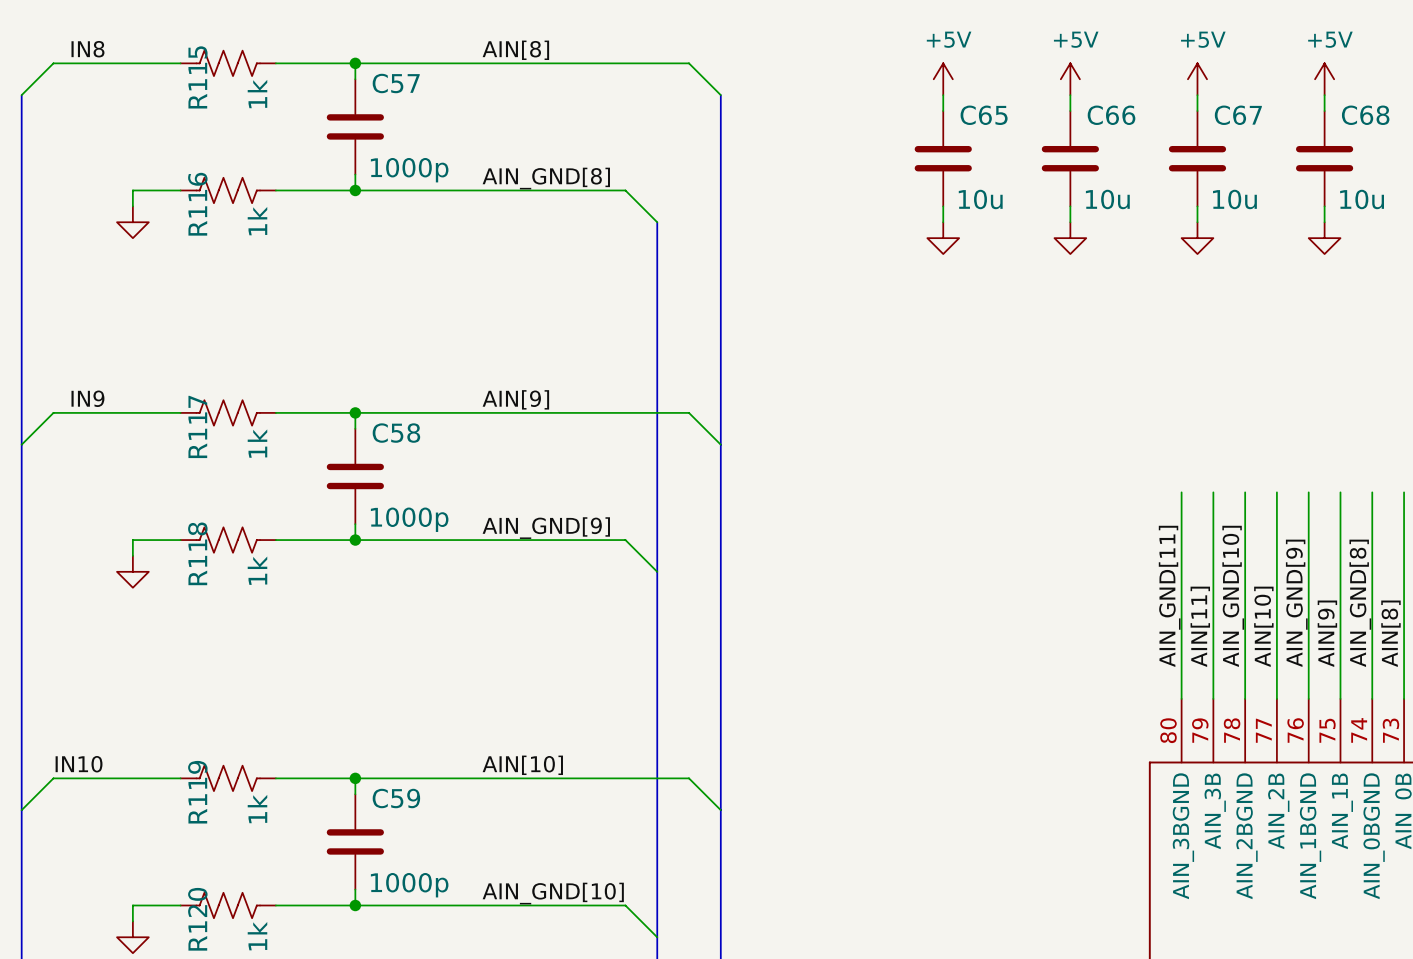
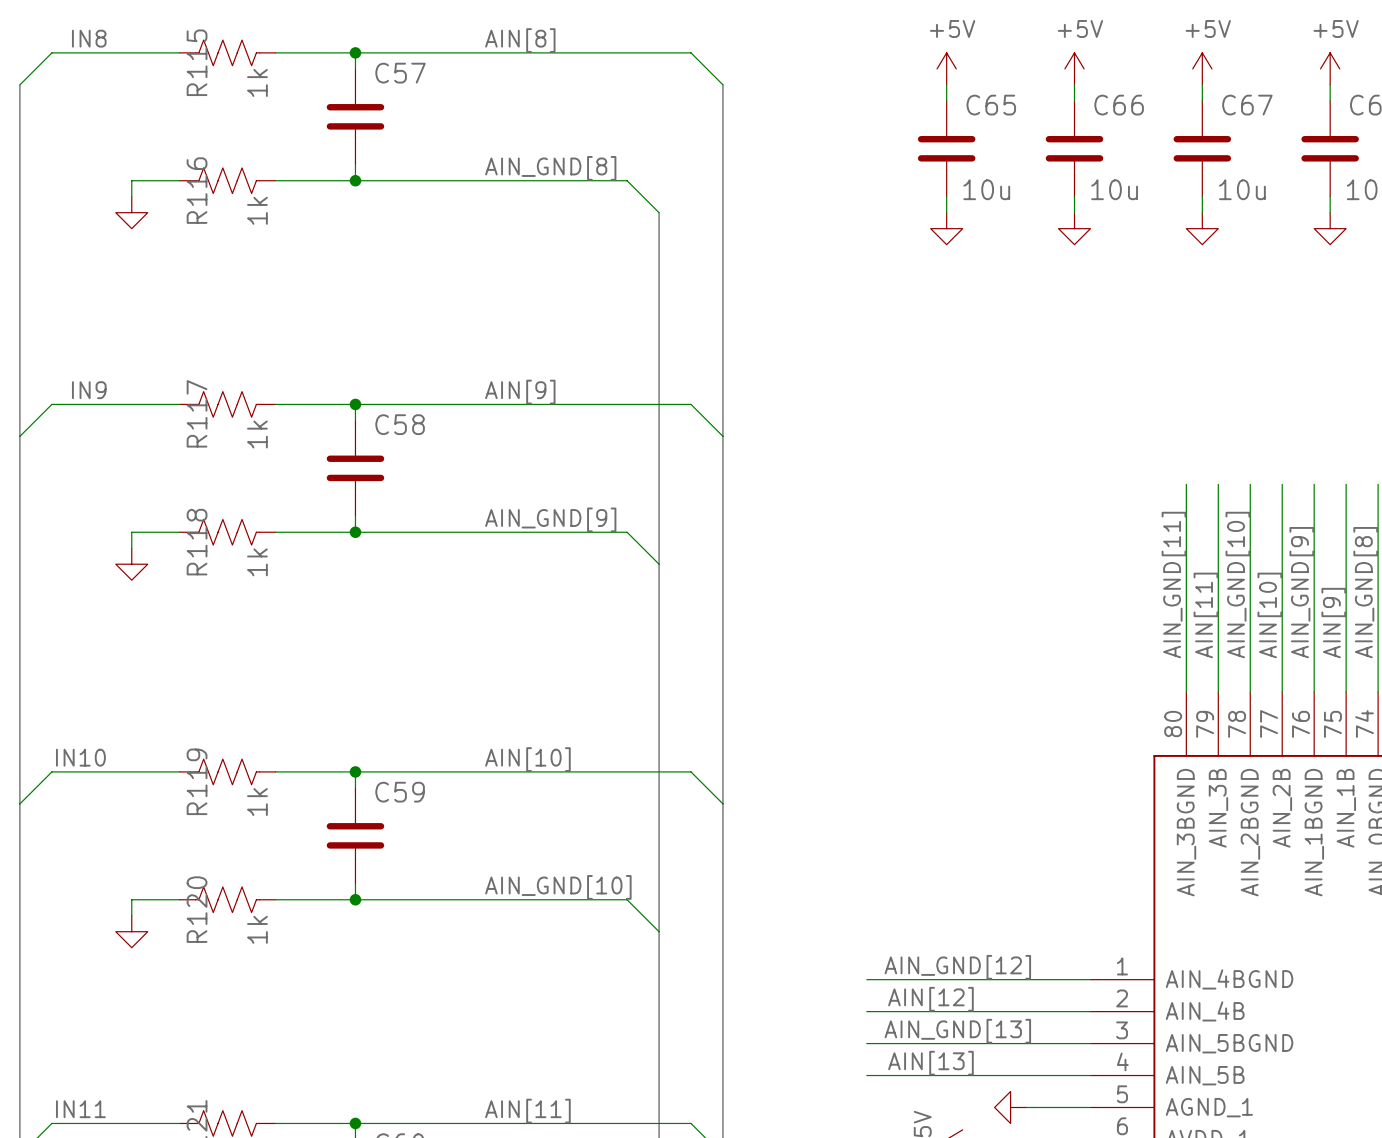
C57 value: 1000p (409, 170) -> none
C58 value: 1000p (409, 519) -> none
C59 value: 1000p (409, 885) -> none

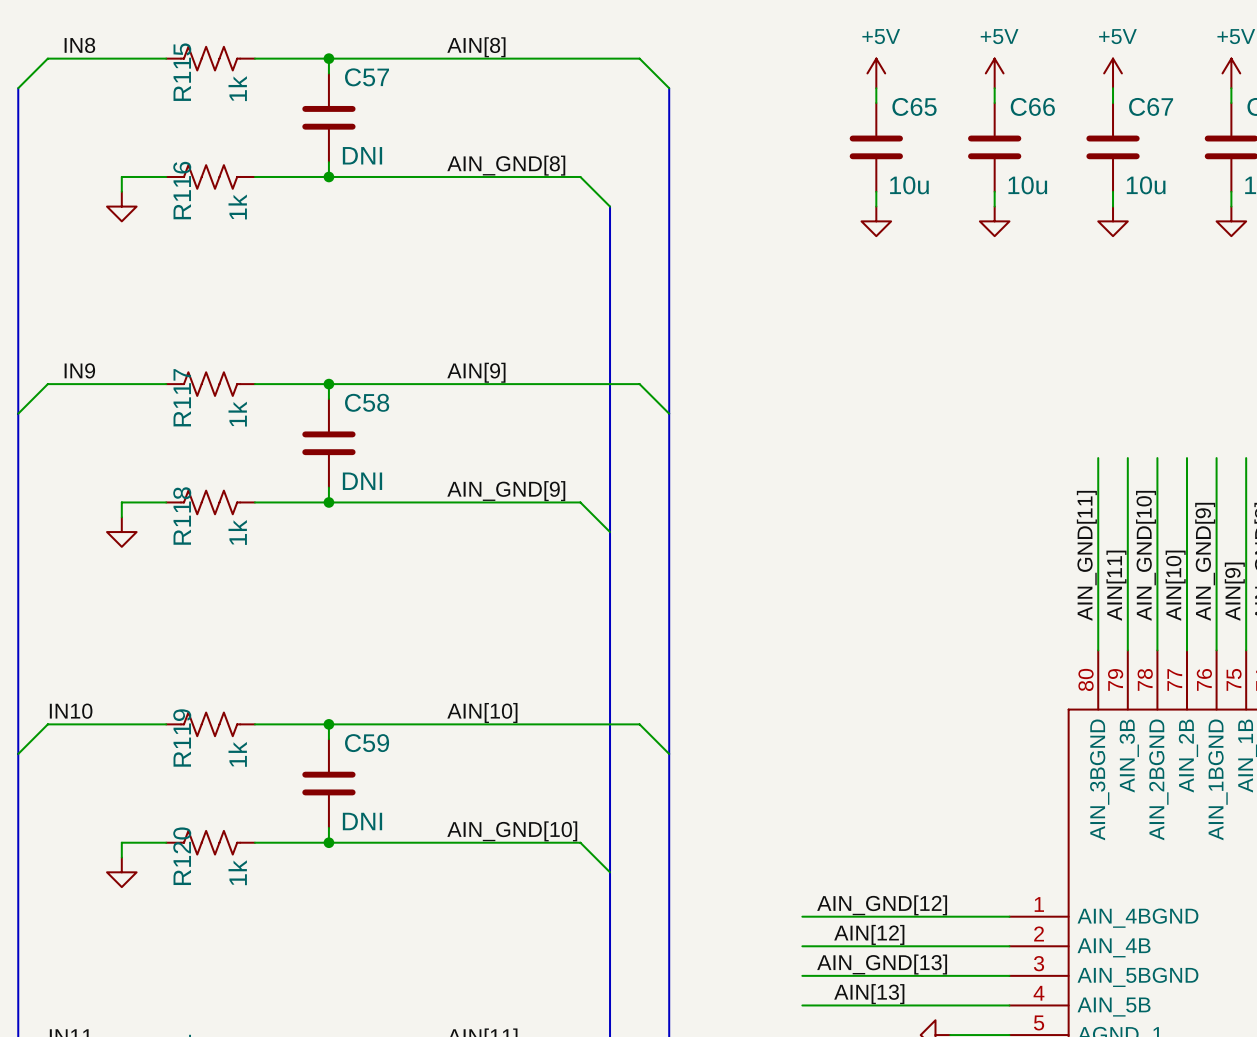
C57 value: none -> DNI (362, 155)
C58 value: none -> DNI (362, 481)
C59 value: none -> DNI (362, 821)

